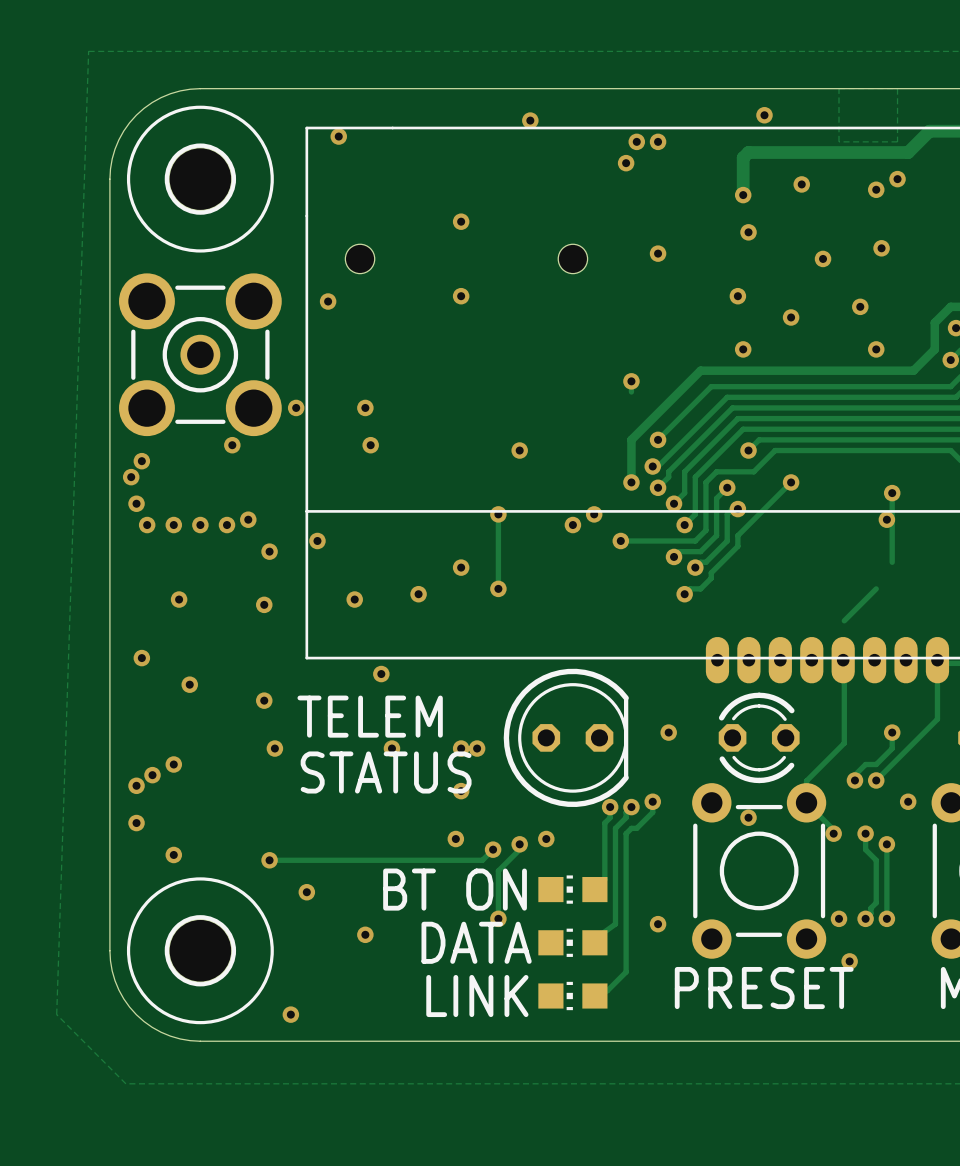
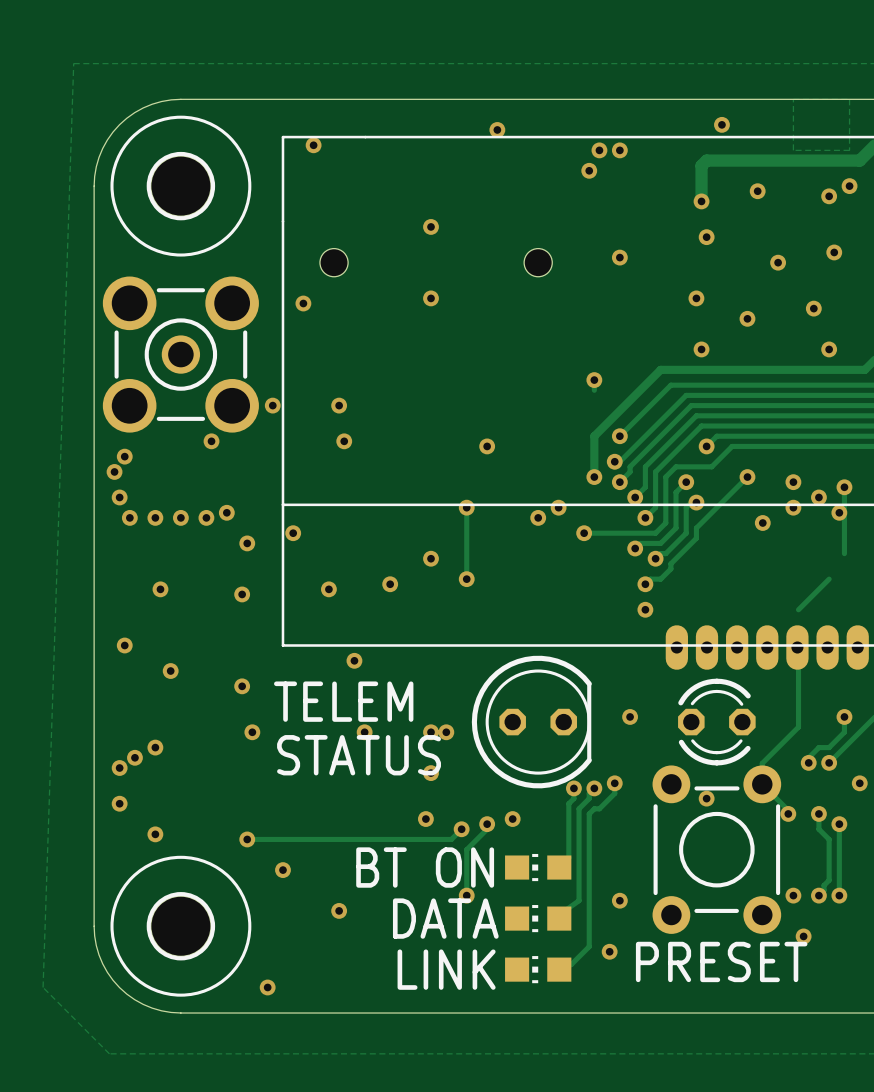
via: none -> (793, 482)
via: none -> (818, 497)
via: none -> (793, 507)
via: none -> (762, 522)
via: none -> (645, 609)
via: none -> (609, 951)

